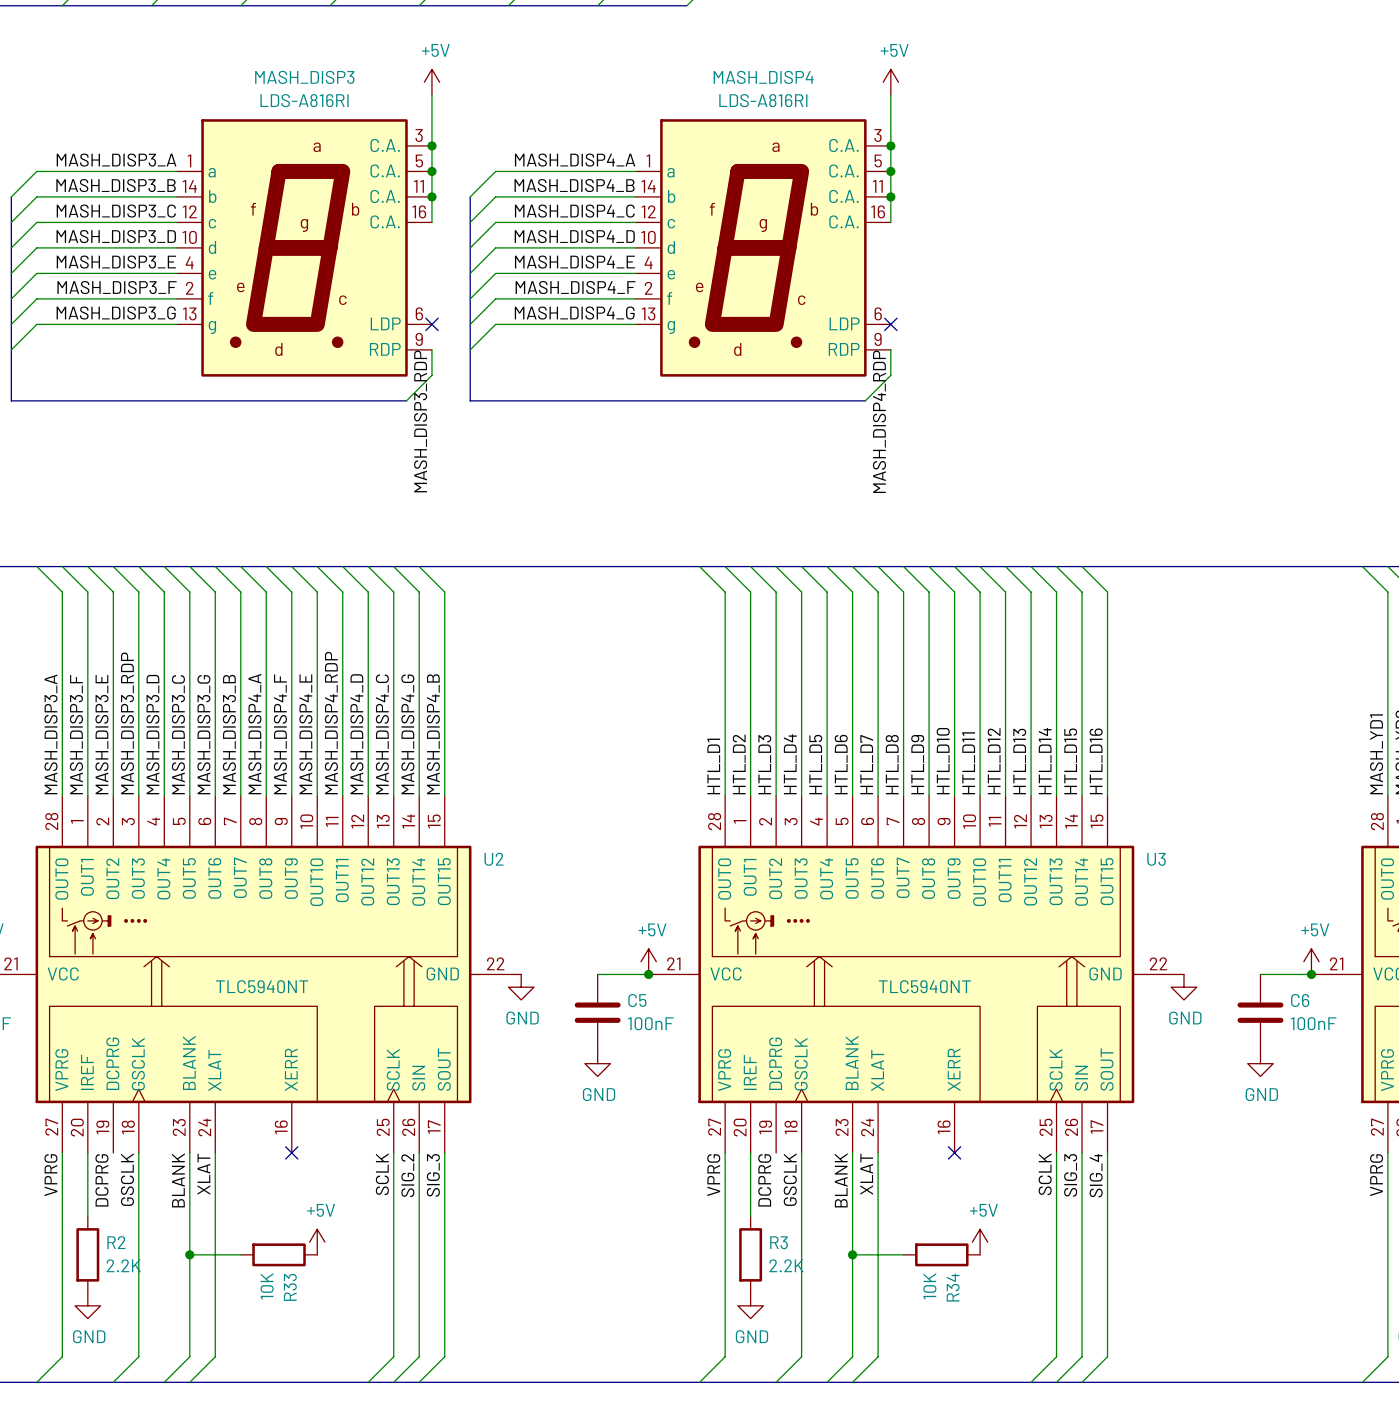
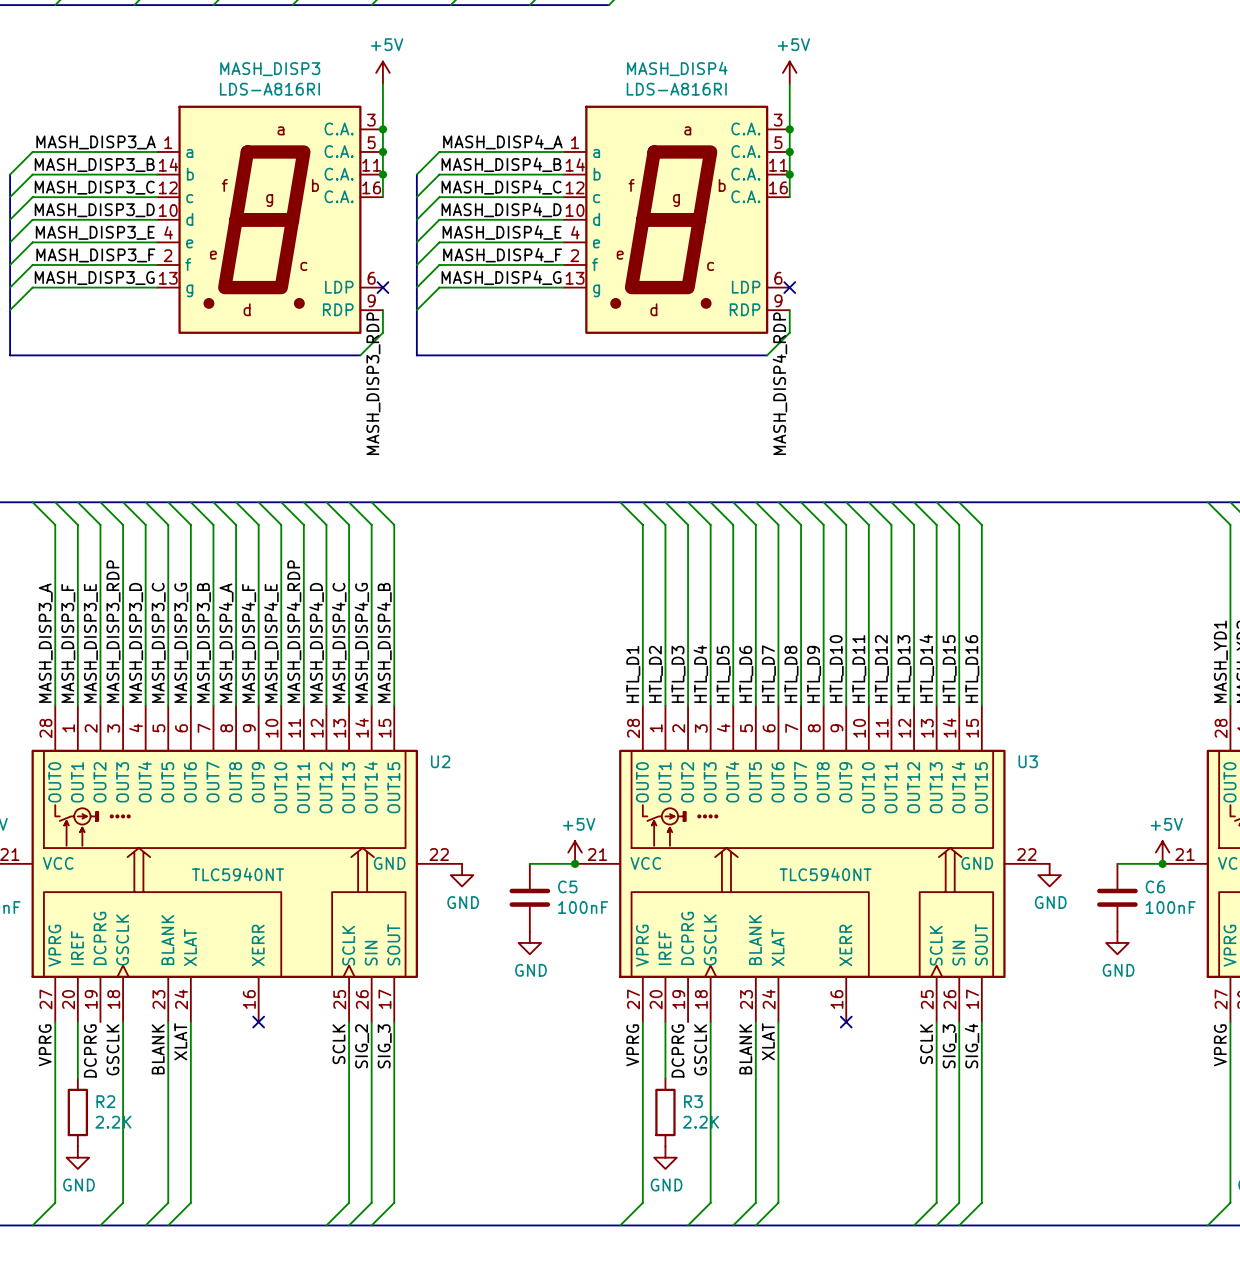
power symbol: +5V (317, 1242) -> none
power symbol: +5V (980, 1242) -> none
wire: (189, 1254) (240, 1254) -> none
junction: (189, 1254) -> none
R33: 10K (279, 1254) -> none
wire: (852, 1254) (903, 1254) -> none
junction: (852, 1254) -> none
R34: 10K (941, 1254) -> none

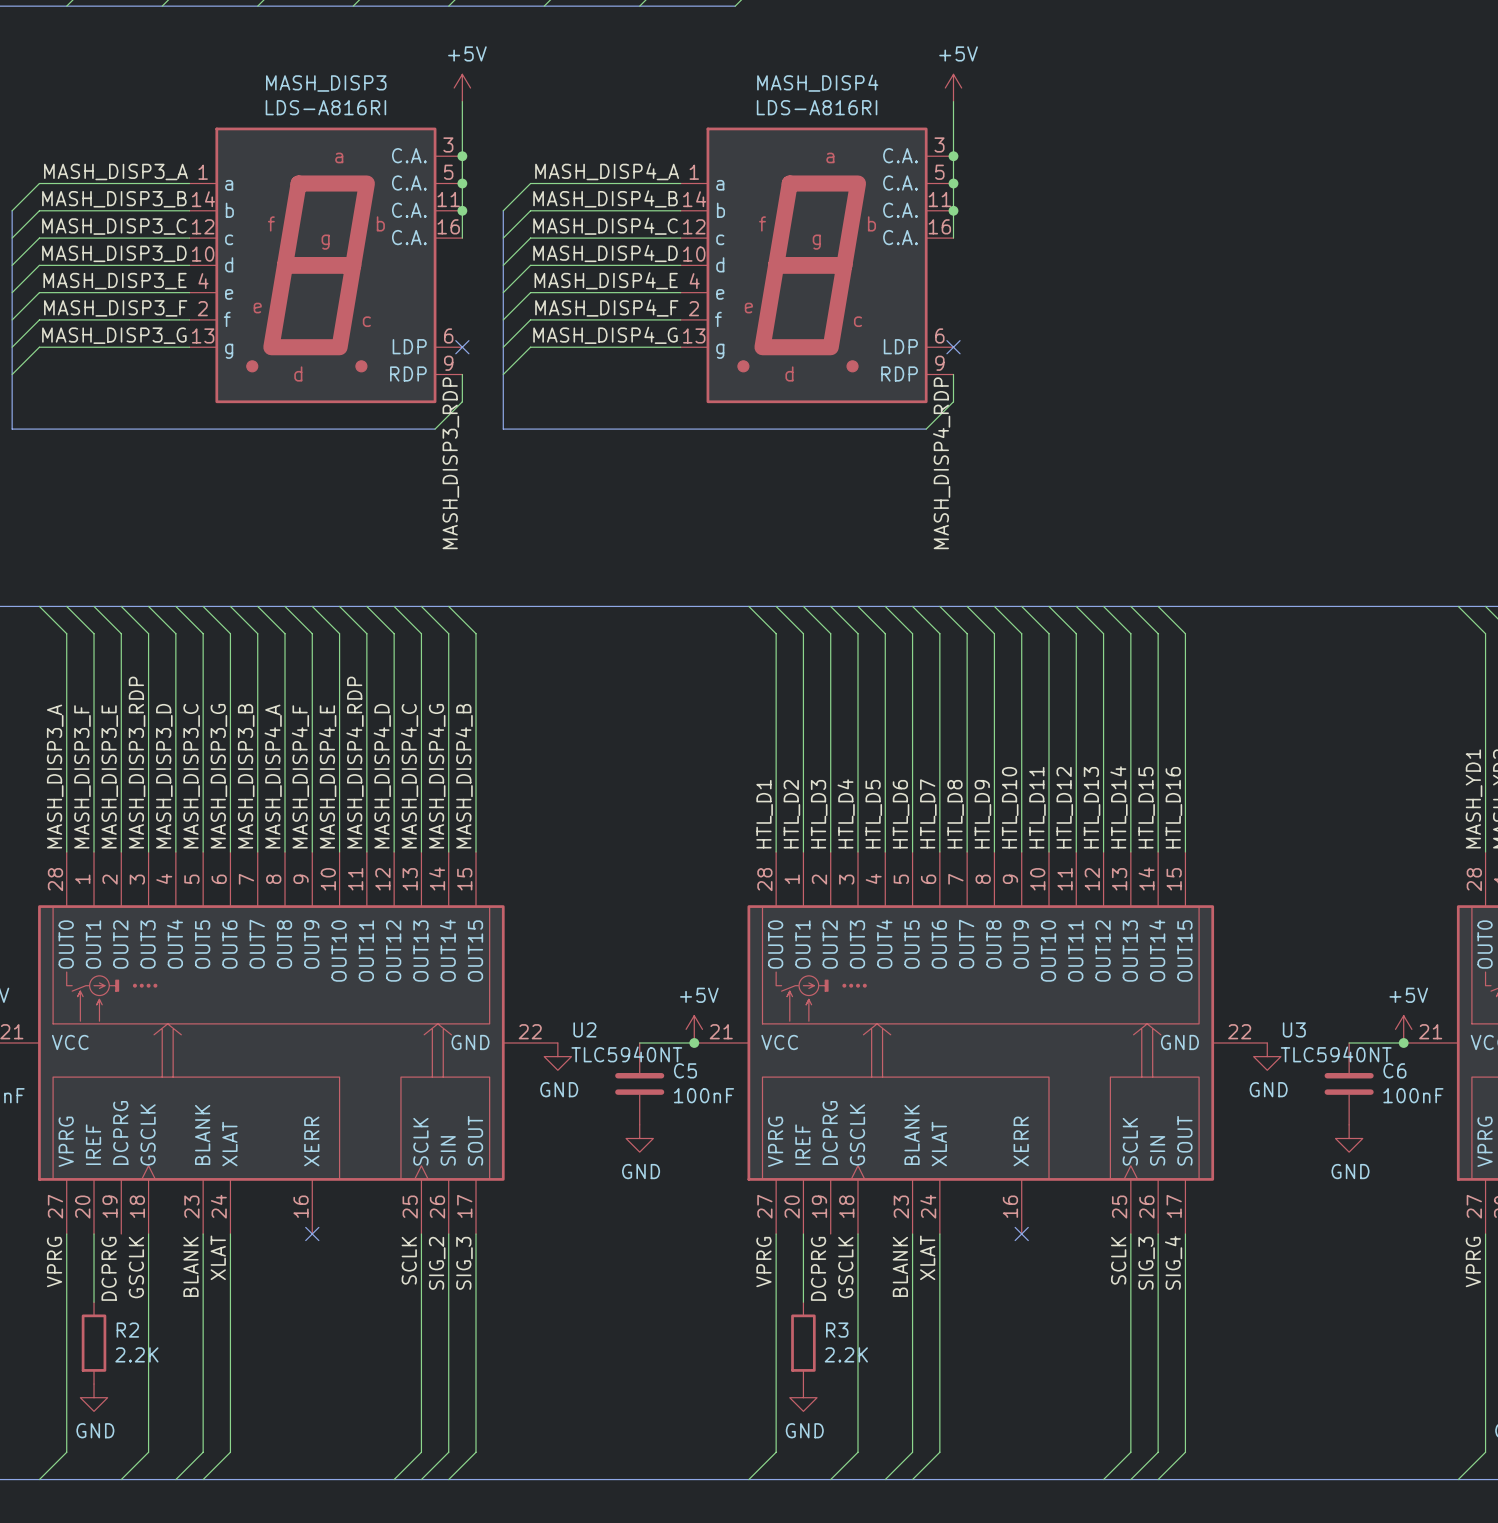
U2 name position: U2 (440, 761) -> U2 (584, 1029)
U3 name position: U3 (1028, 761) -> U3 (1294, 1029)
U2 value position: TLC5940NT (238, 874) -> TLC5940NT (626, 1054)
U3 value position: TLC5940NT (825, 874) -> TLC5940NT (1336, 1054)

